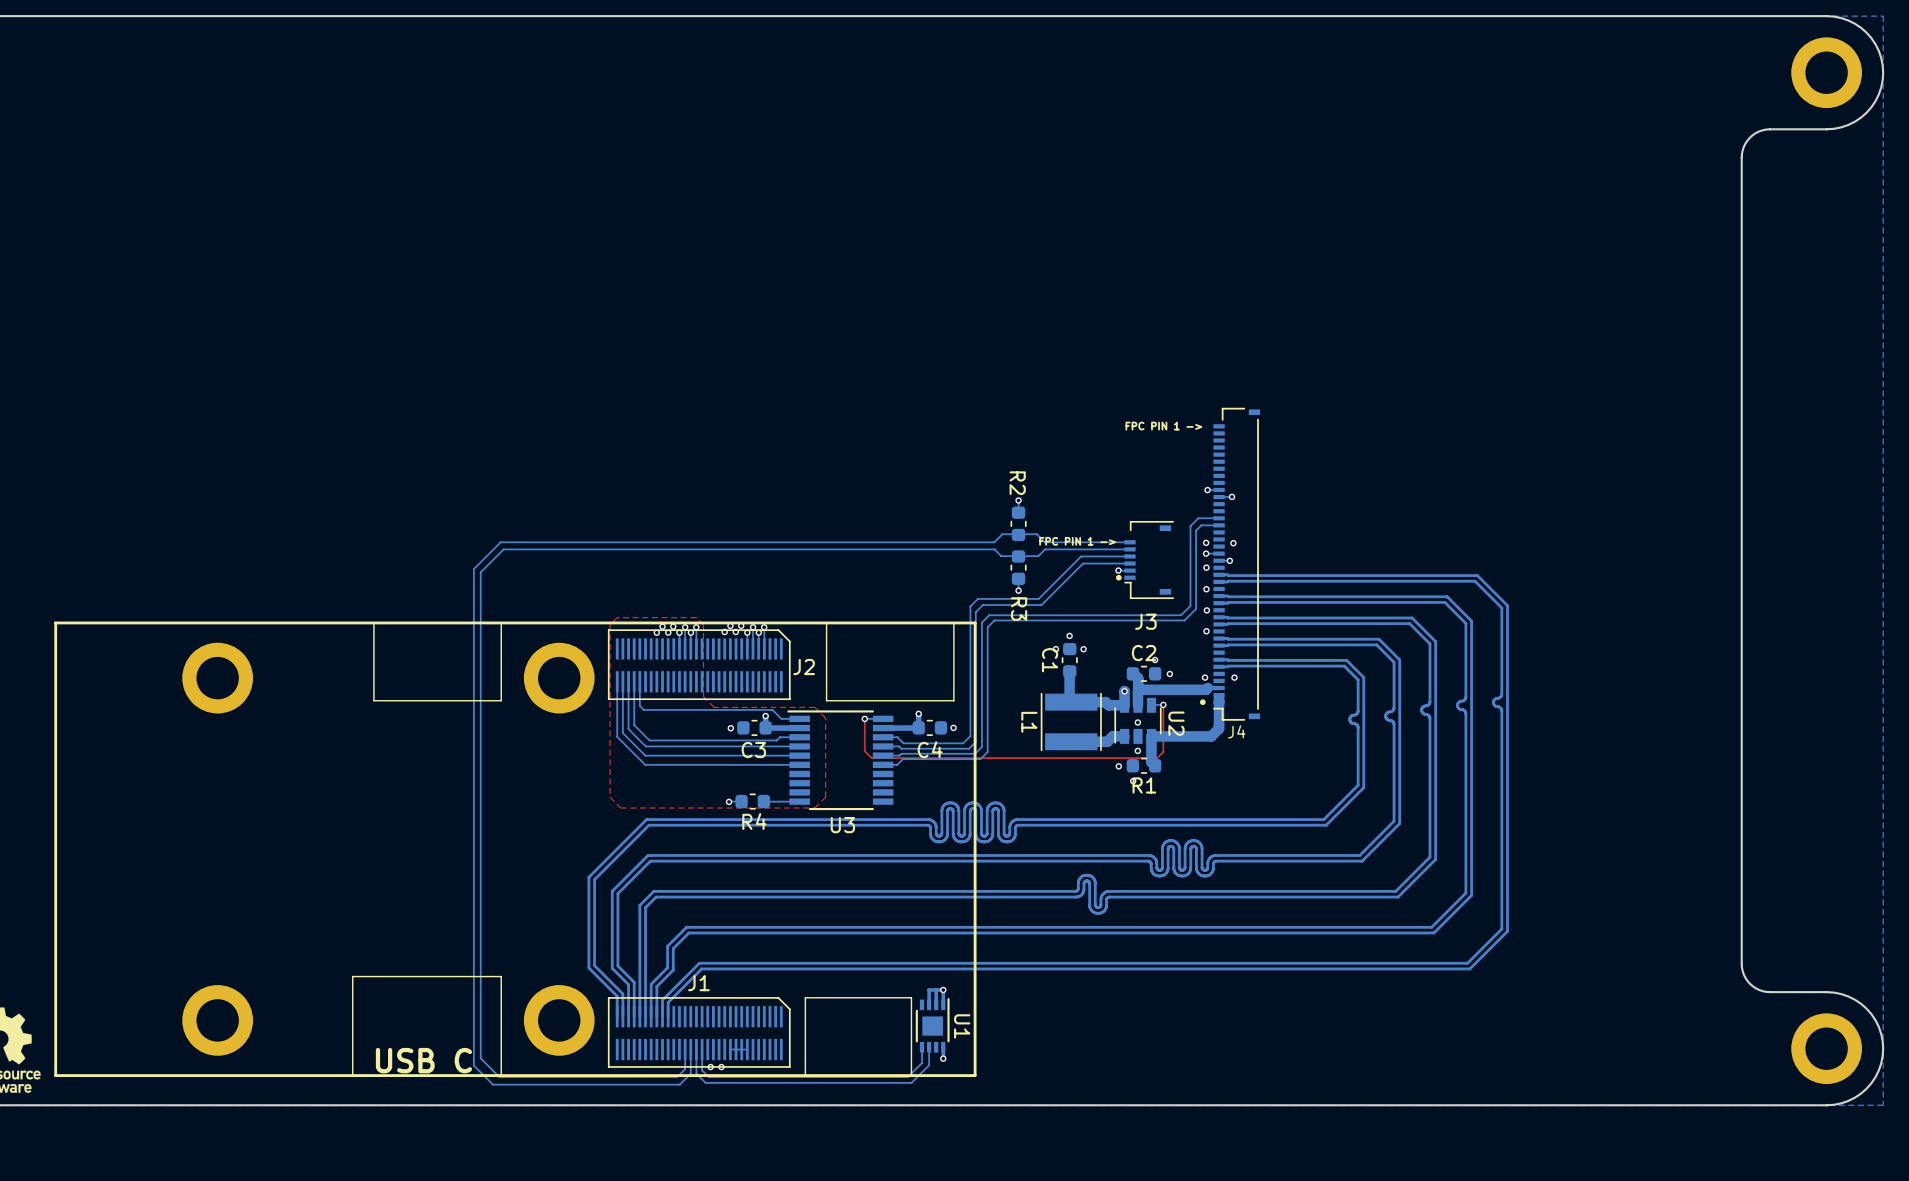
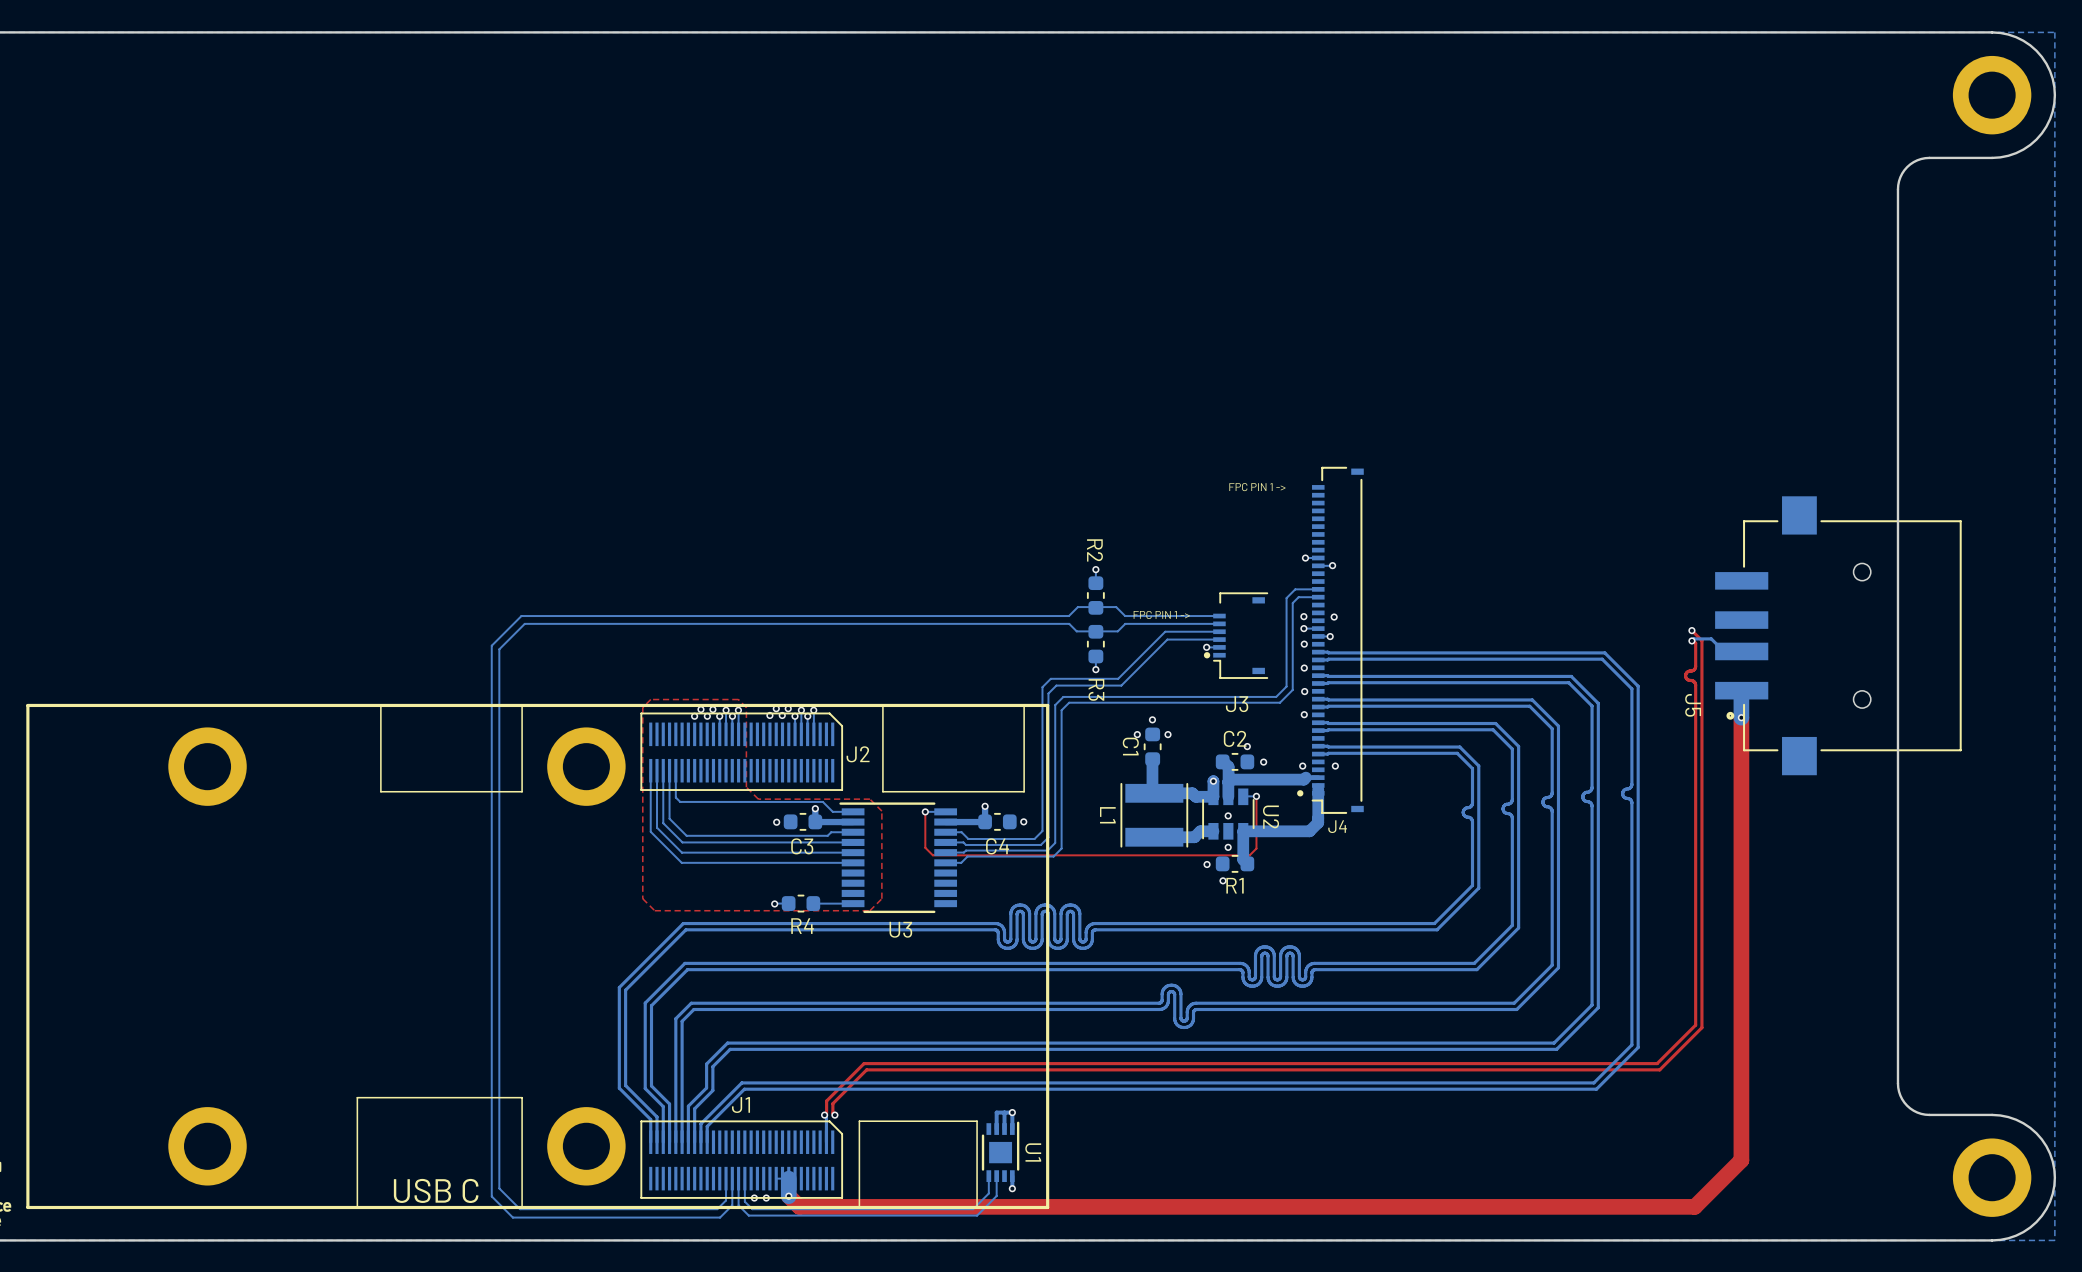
top track: none -> (1691, 630) (1701, 640) (1701, 1027) (1659, 1069) (866, 1069) (832, 1103) (832, 1113) (834, 1115)
via: none -> (1691, 630)
J5: none -> (1838, 635)
bottom track: none -> (1691, 640) (1693, 638) (1711, 638) (1723, 651) (1741, 651)
top track: none -> (1691, 640) (1695, 643) (1695, 667) (1692, 670) (1687, 672) (1685, 675) (1695, 685) (1695, 1025) (1657, 1063) (864, 1063) (826, 1101) (826, 1113) (824, 1115)
via: none -> (1691, 640)
bottom track: none -> (1741, 690) (1741, 717)
top track: none -> (1741, 717) (1741, 1160) (1694, 1206) (799, 1206) (788, 1196)
via: none -> (1741, 717)
bottom track: none -> (824, 1115) (826, 1116) (826, 1142)
via: none -> (824, 1115)
via: none -> (834, 1115)
bottom track: none -> (788, 1178) (788, 1196)
via: none -> (788, 1196)

